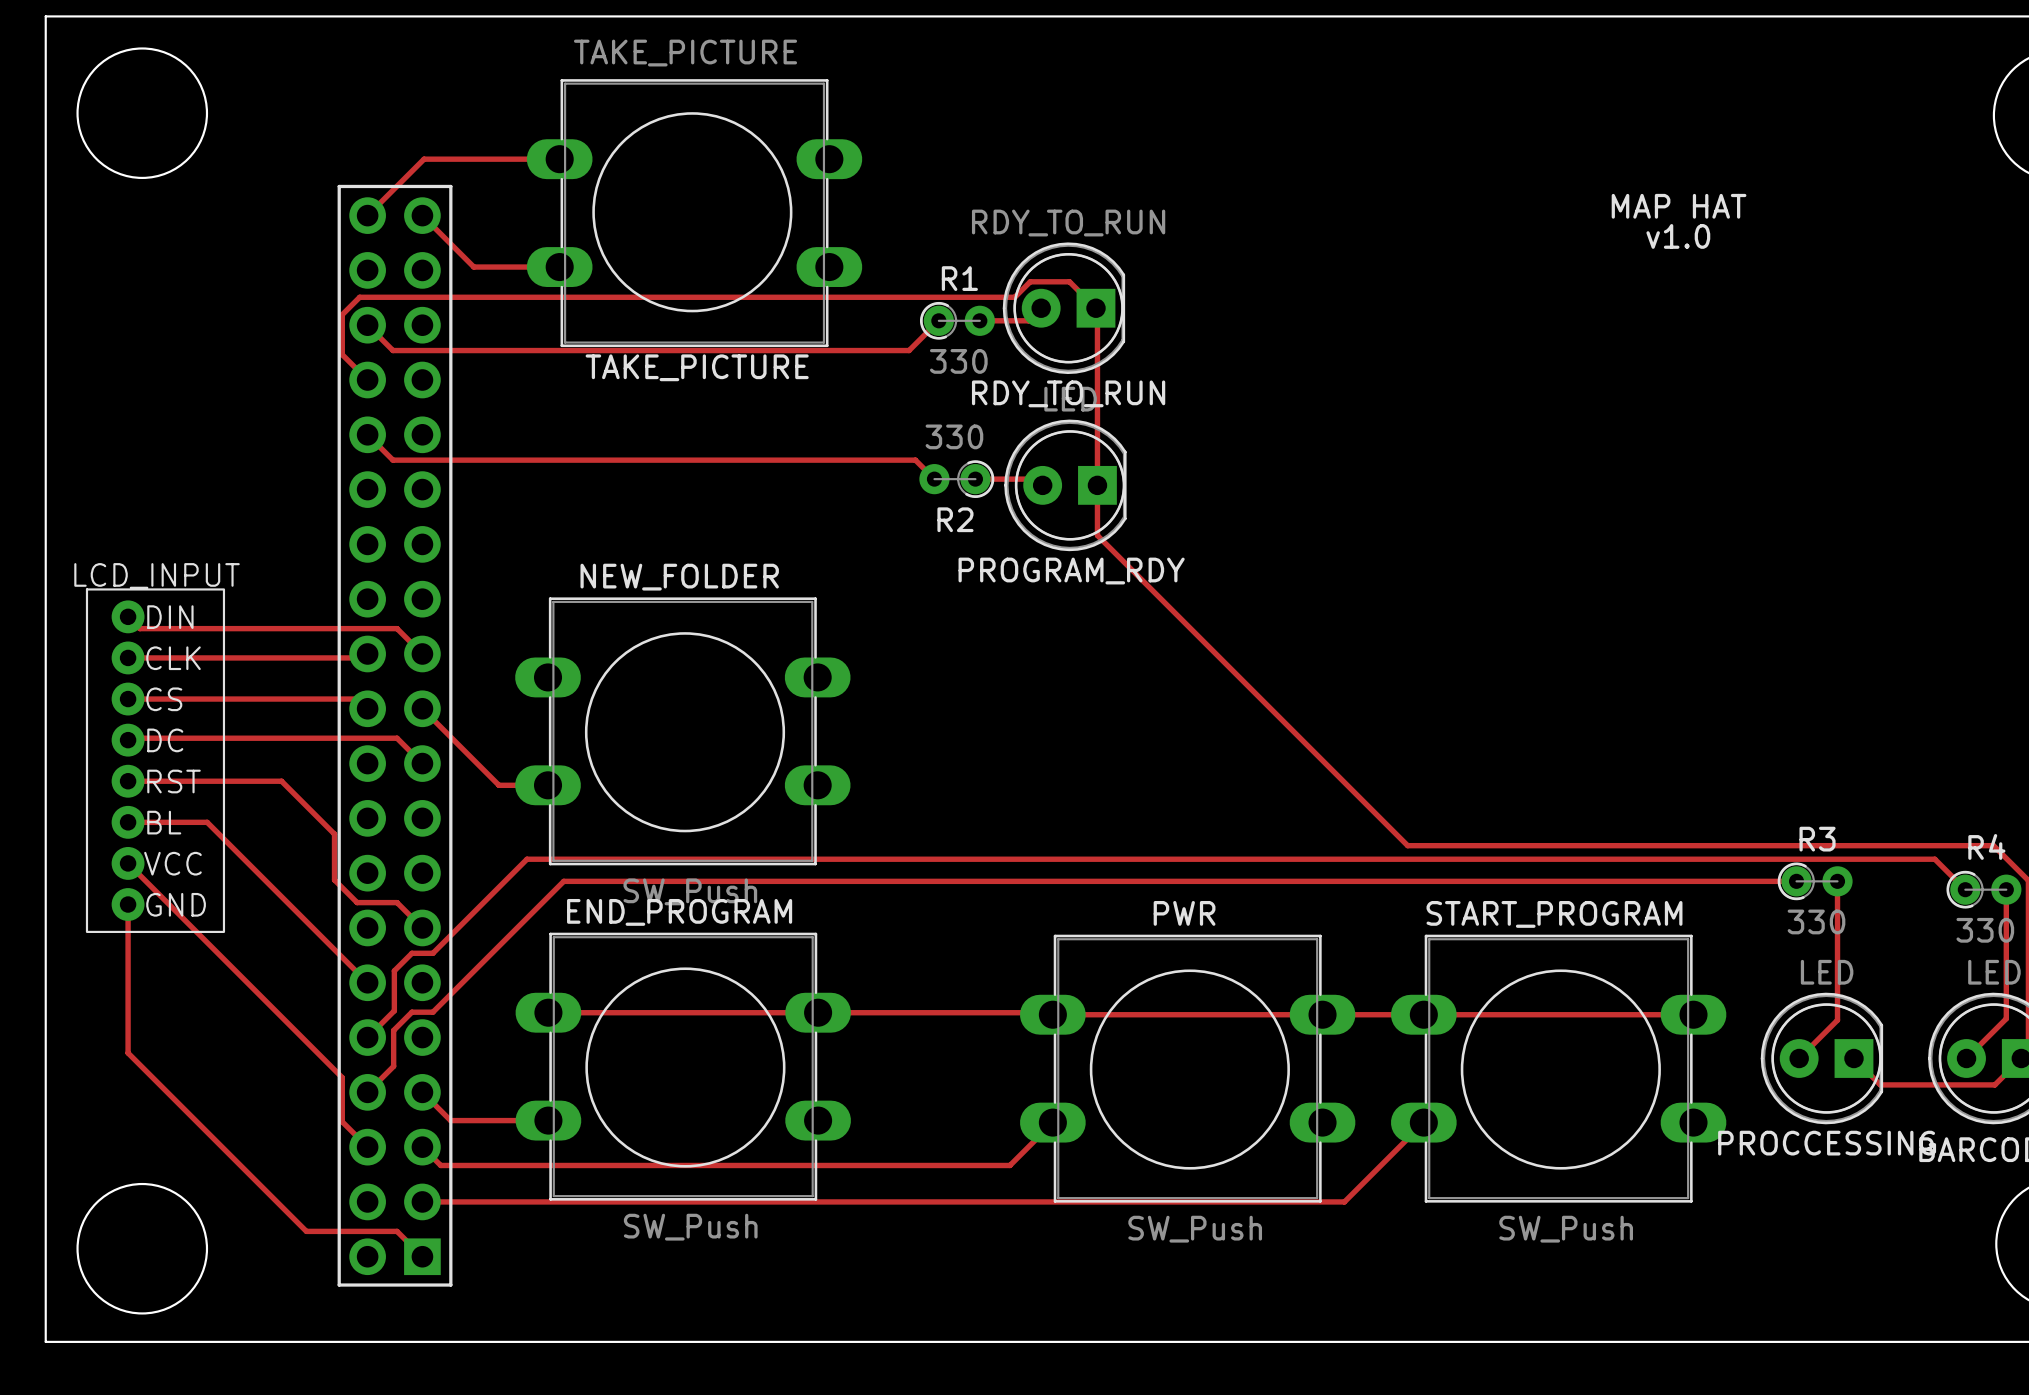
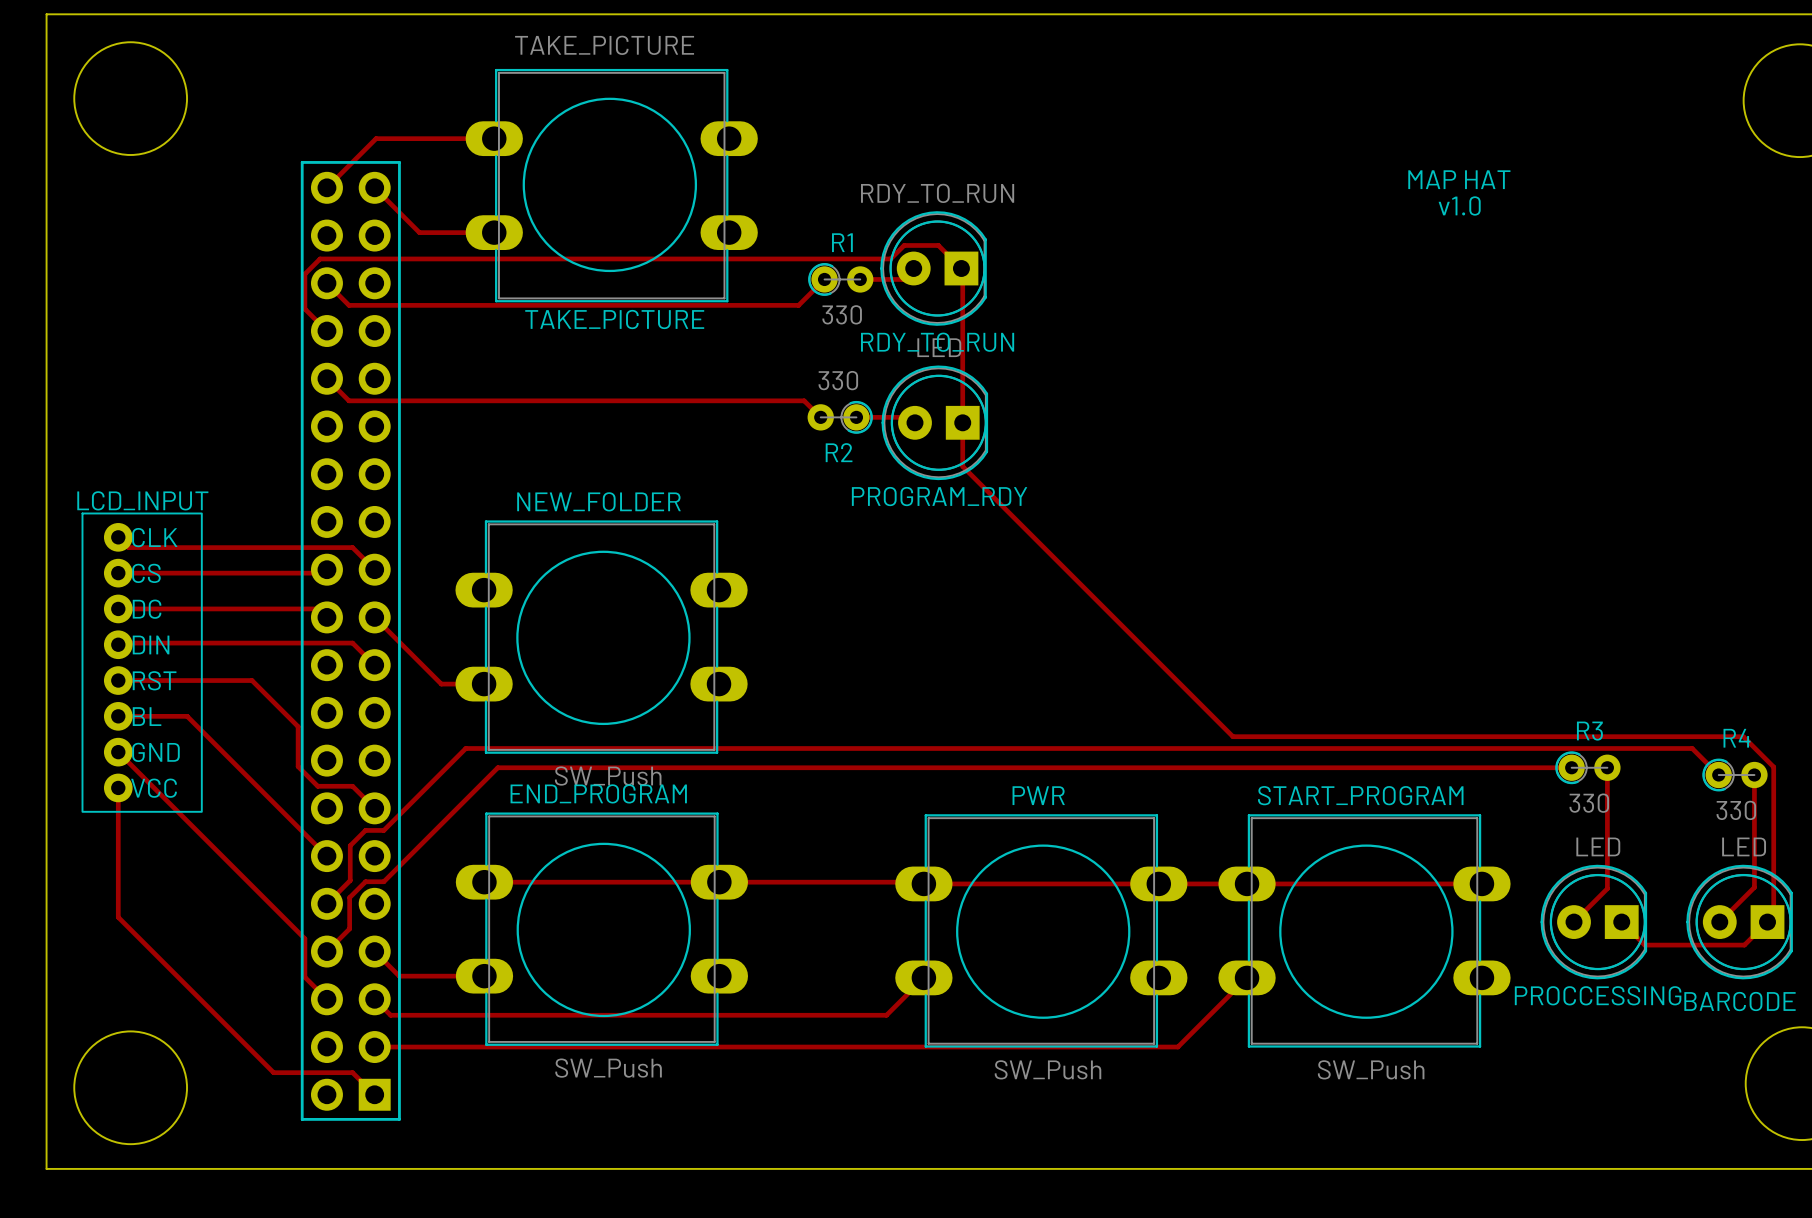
LCD_INPUT text: DIN (170, 617) -> CLK (154, 537)
LCD_INPUT text: CLK (173, 658) -> CS (146, 573)
LCD_INPUT text: CS (164, 699) -> DC (147, 609)
LCD_INPUT text: DC (165, 740) -> DIN (151, 644)
LCD_INPUT text: VCC (172, 863) -> GND (155, 752)
LCD_INPUT text: GND (176, 904) -> VCC (154, 788)

